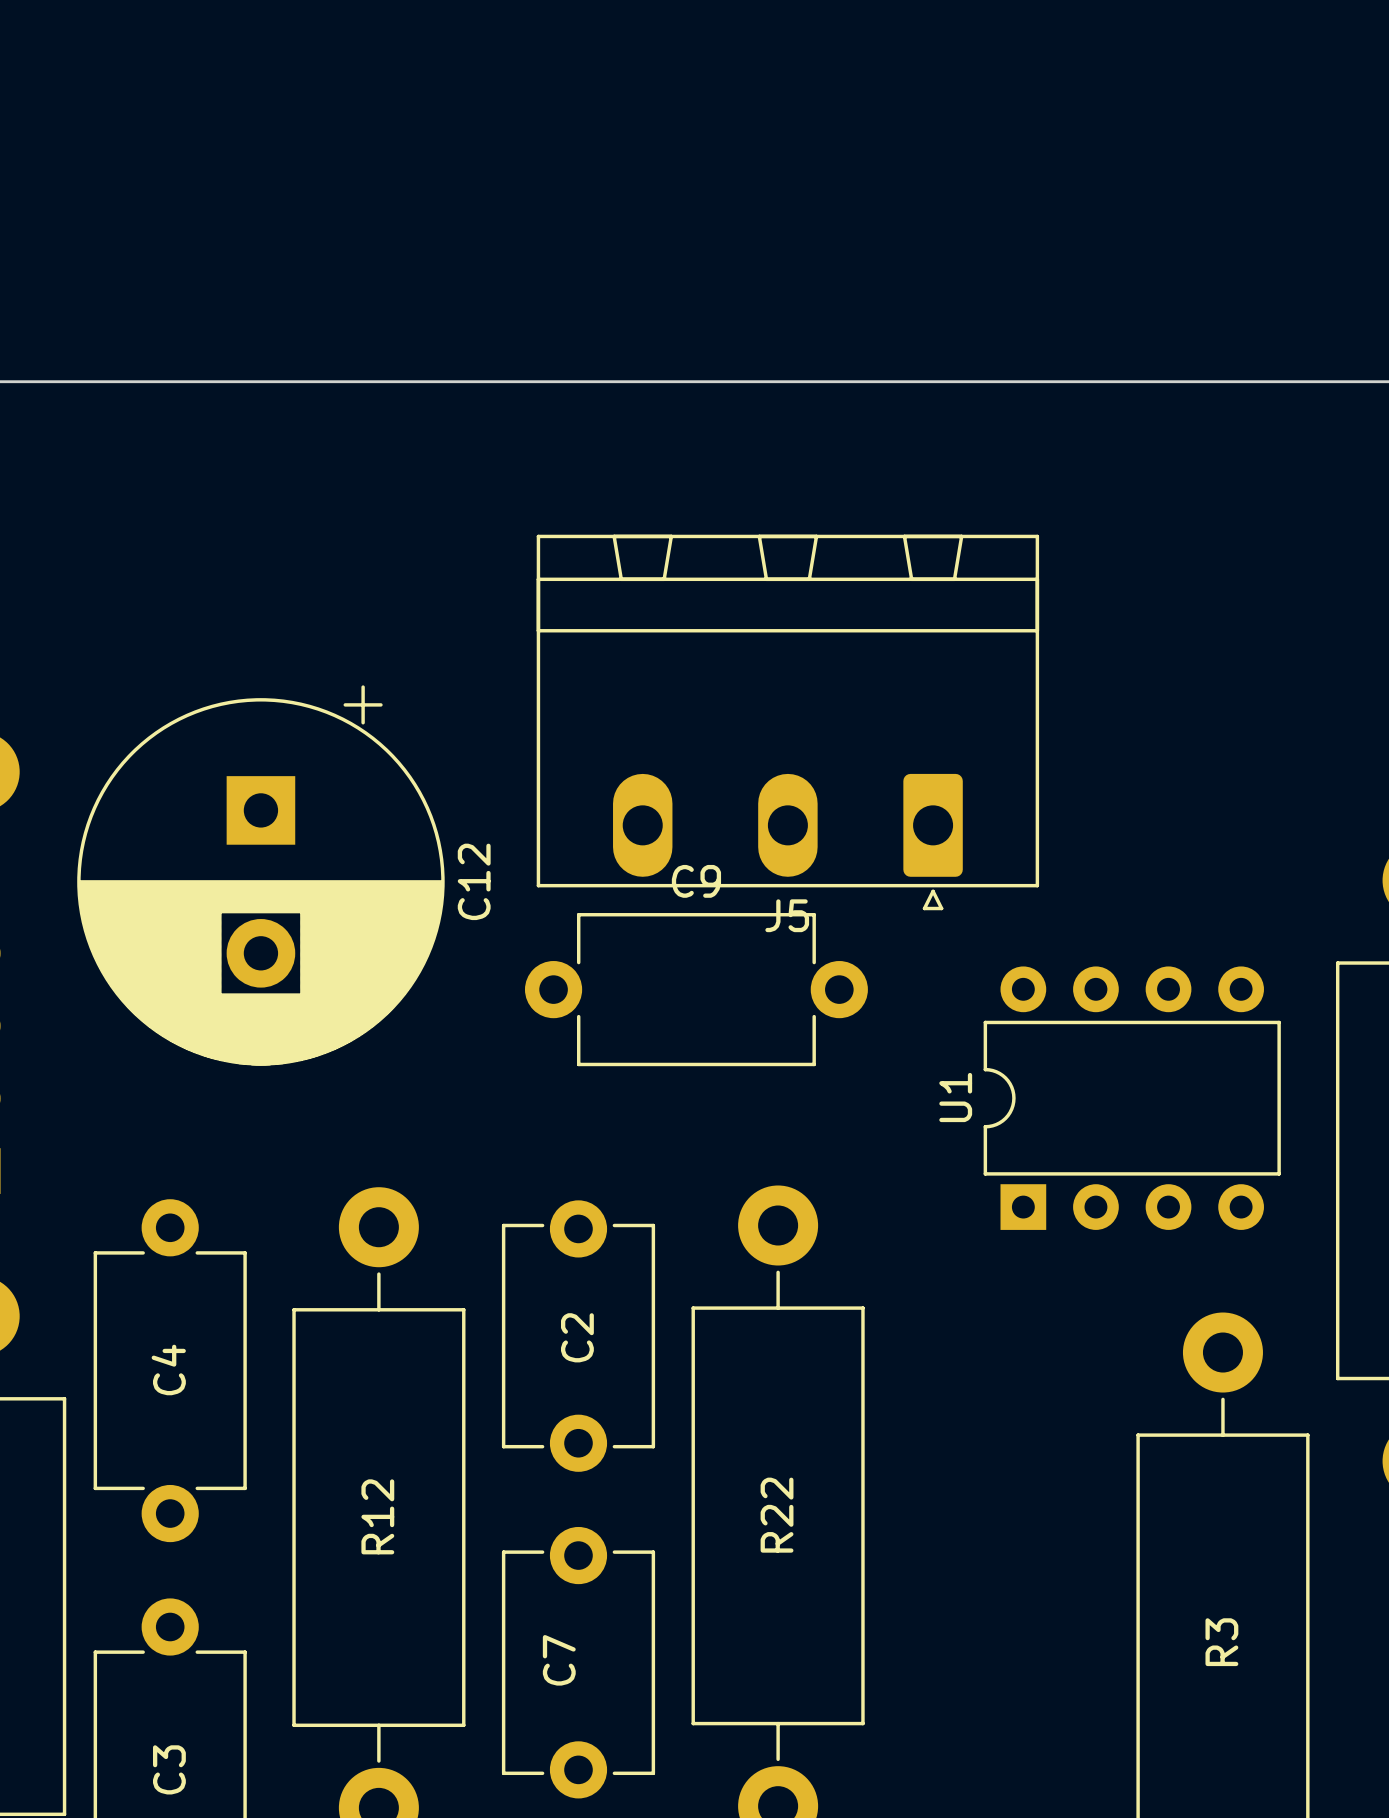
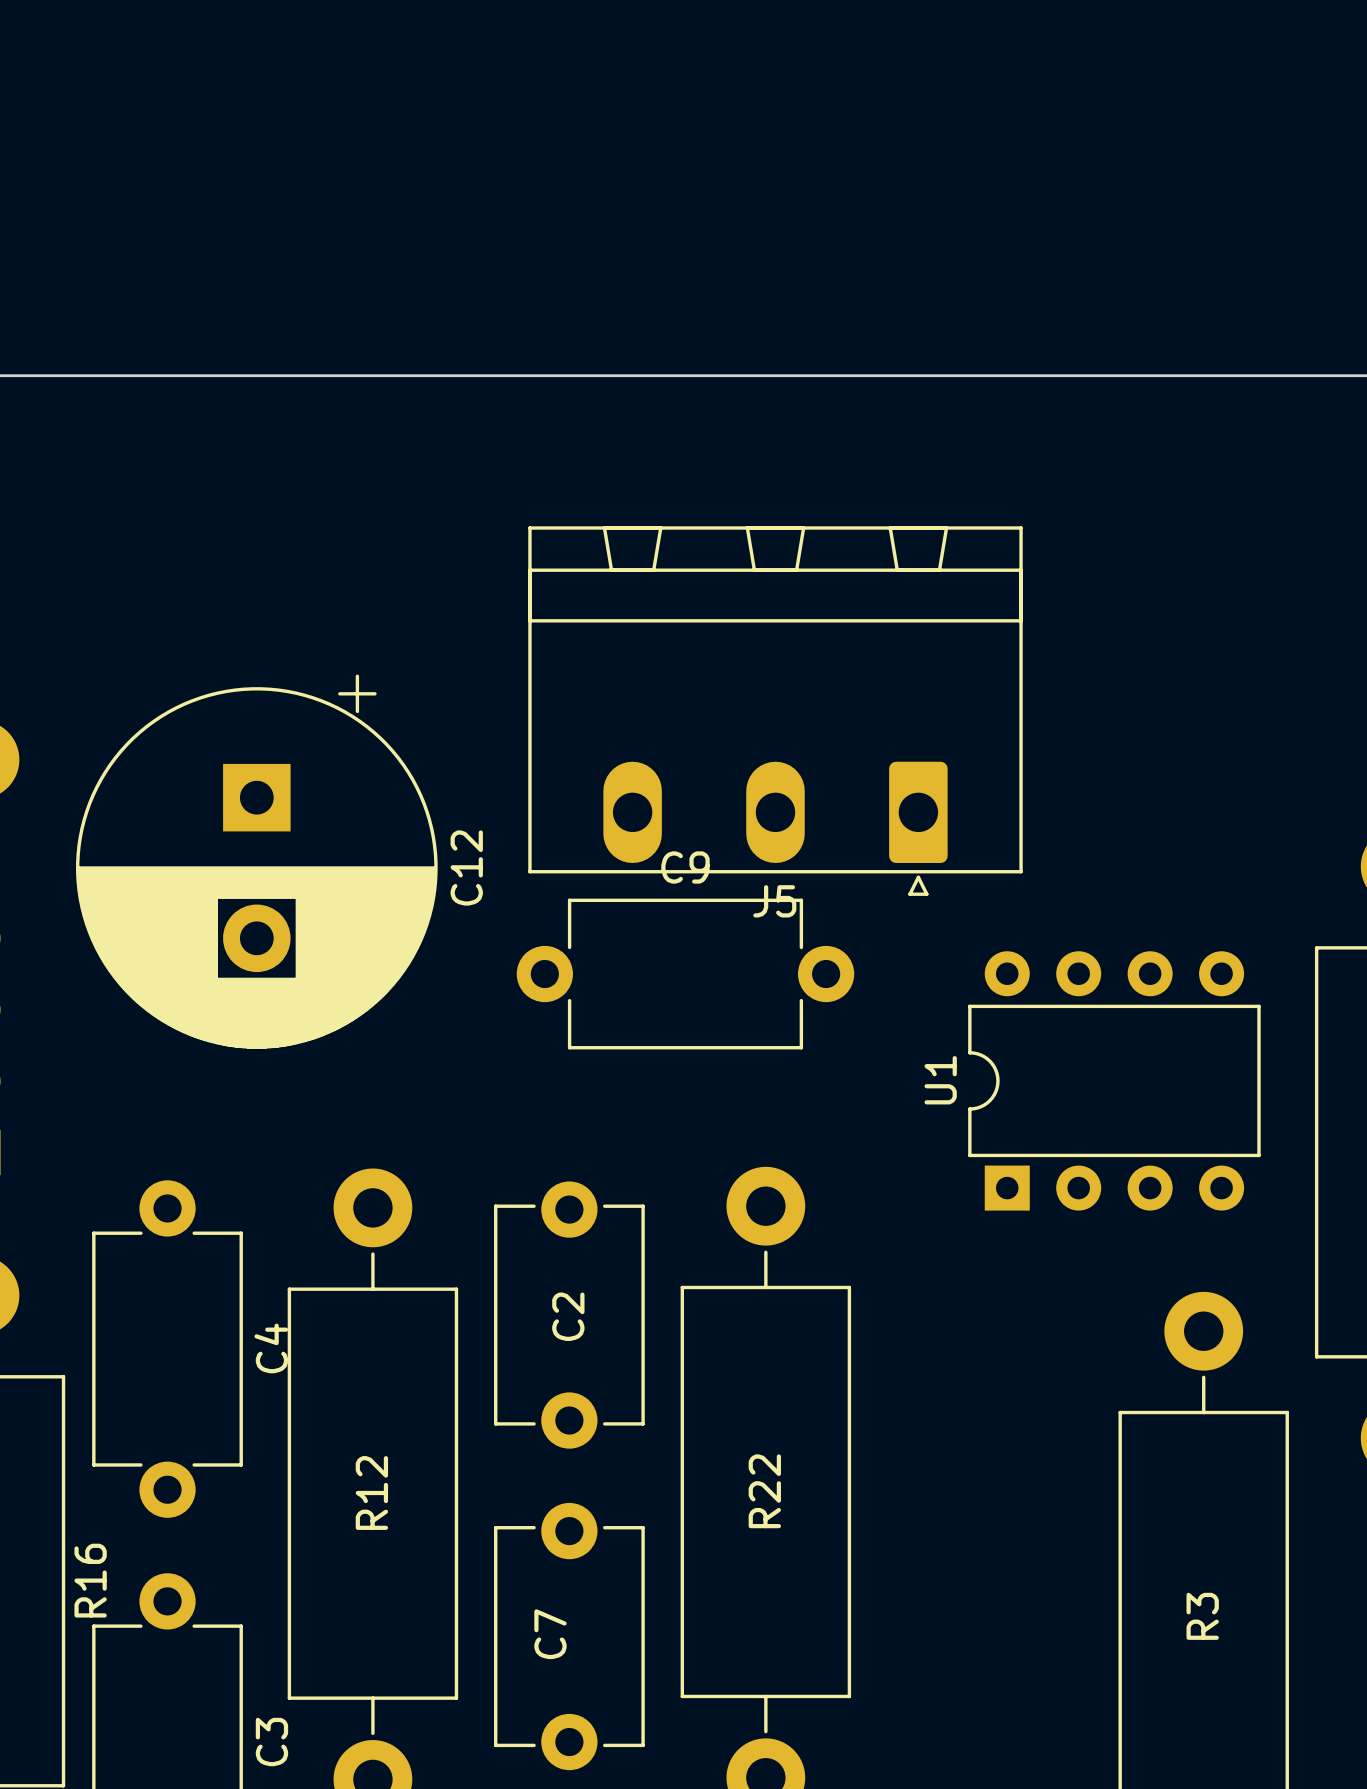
C4 name position: C4 (168, 1369) -> C4 (271, 1348)
R16 name: none -> R16 (90, 1580)
C3 name position: C3 (169, 1769) -> C3 (271, 1742)

